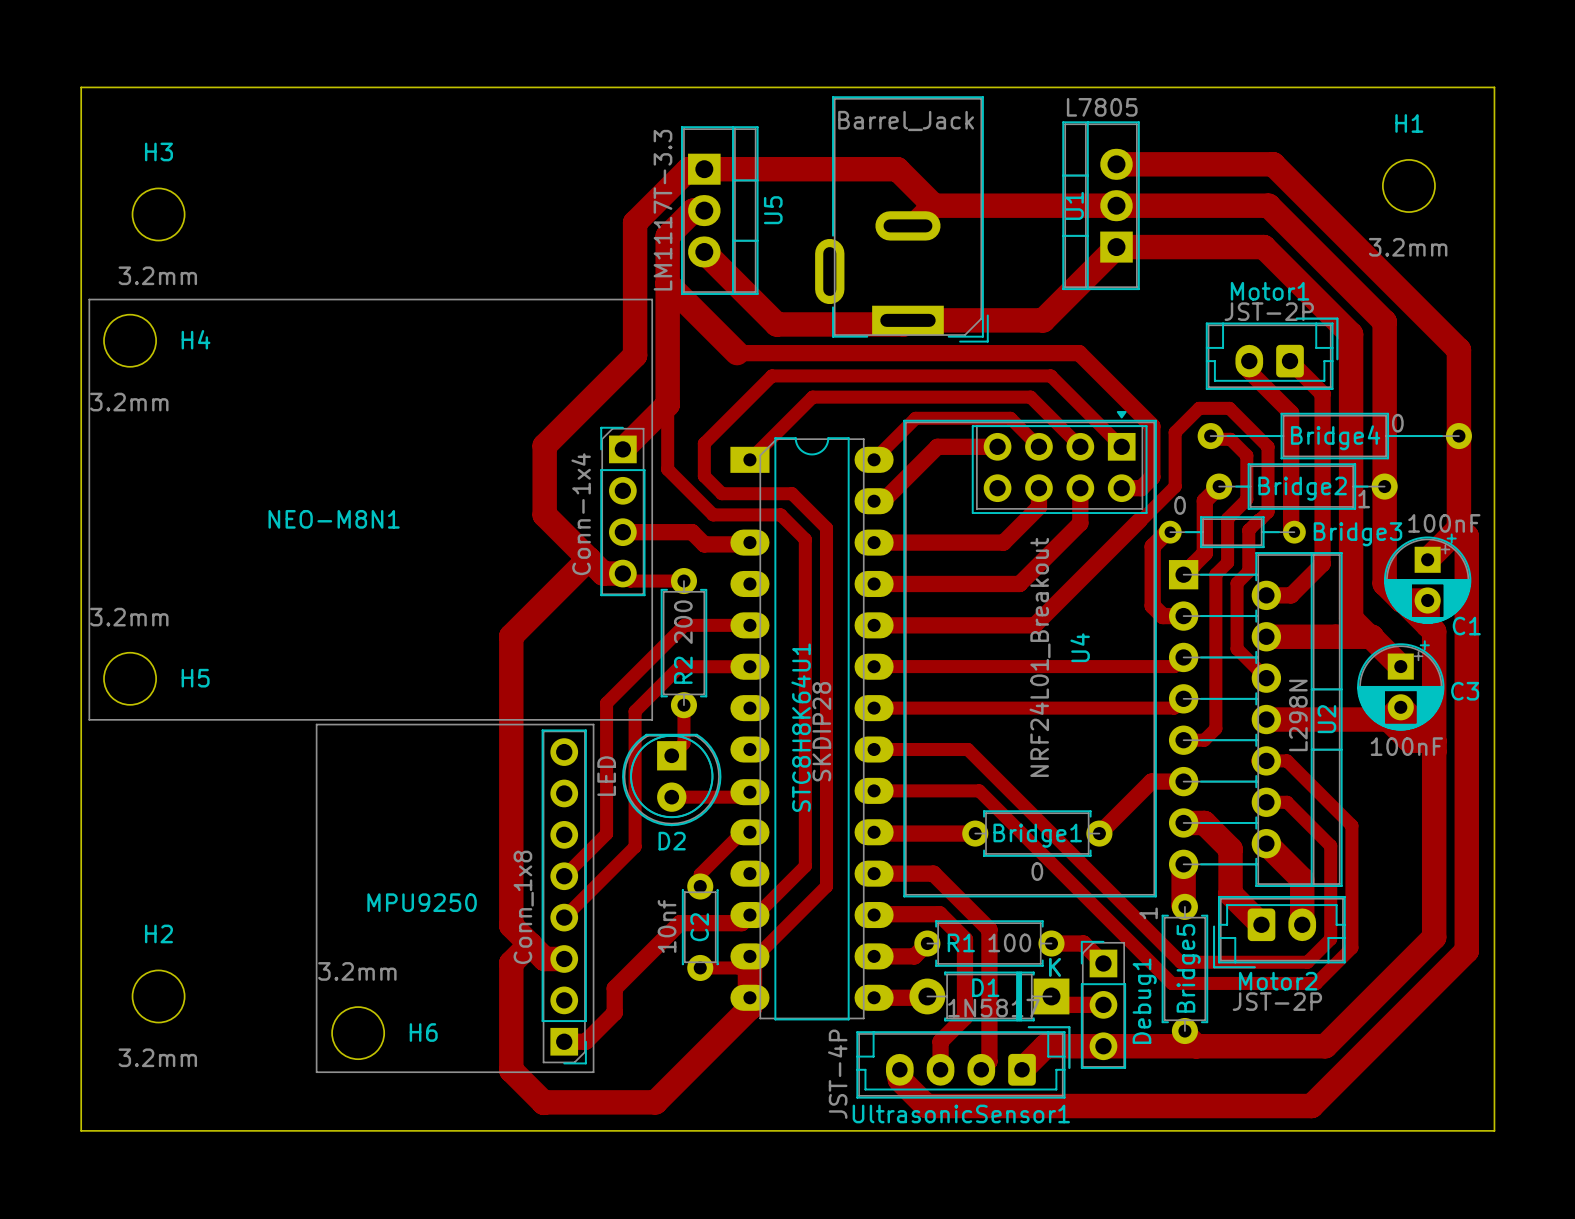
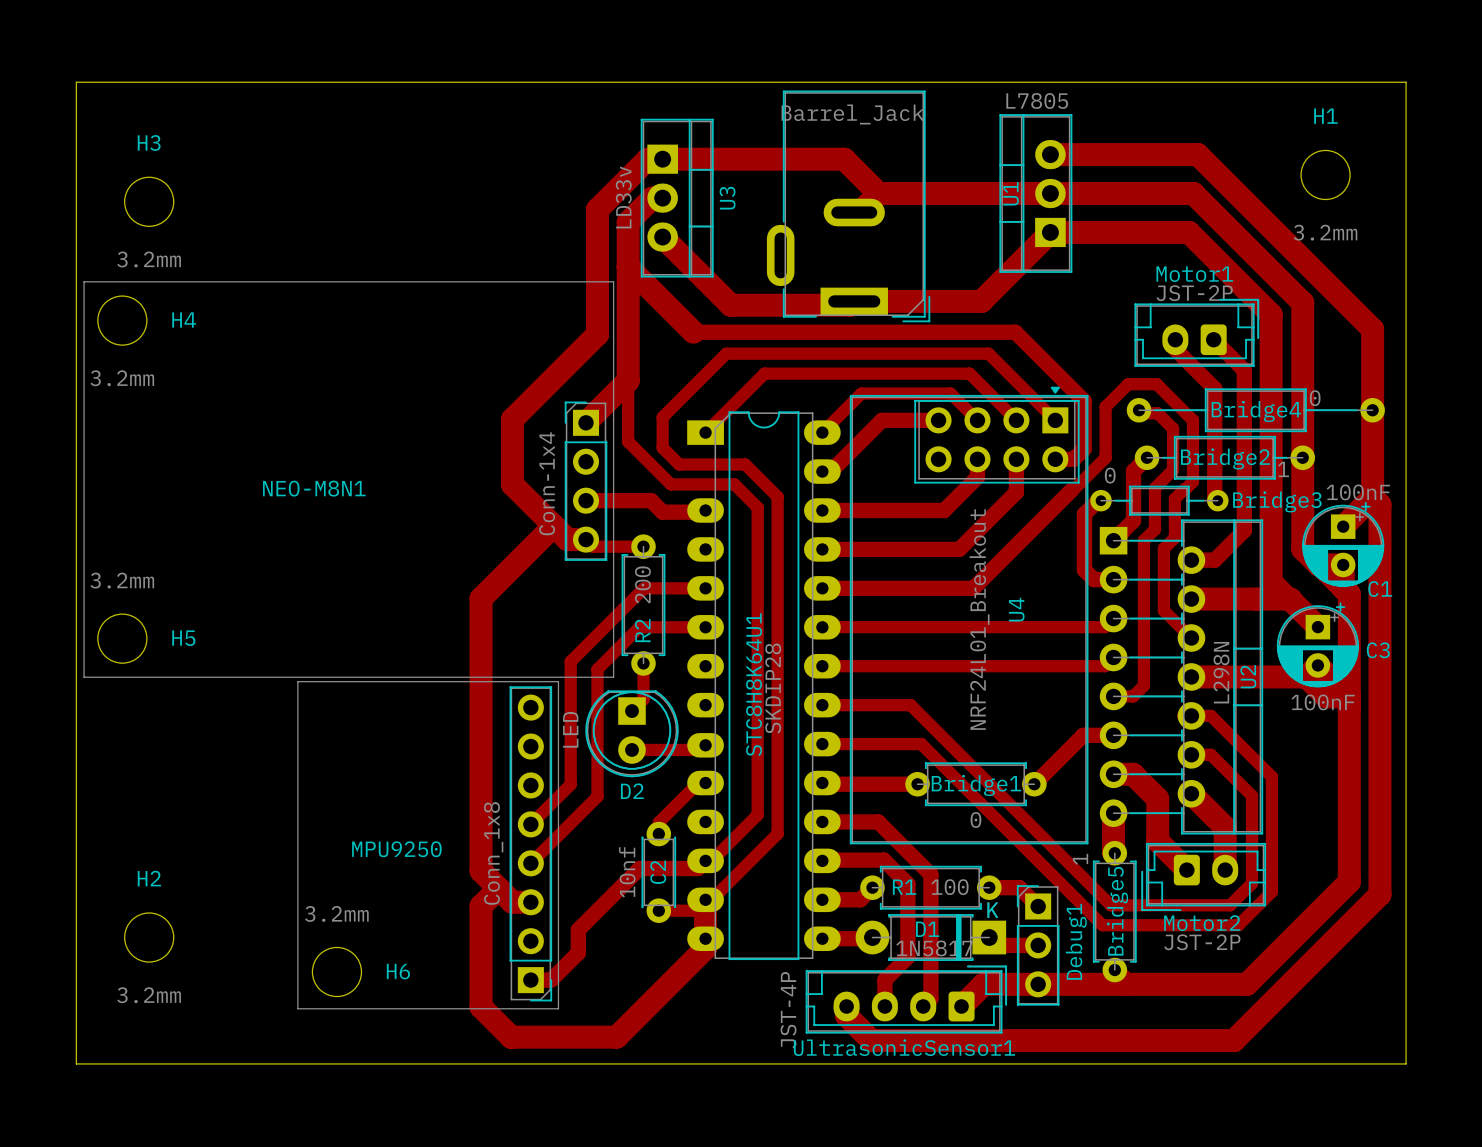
U5 value: LM1117T-3.3 (662, 210) -> LD33v (623, 197)
U5 name: U5 (773, 210) -> U3 (727, 198)

